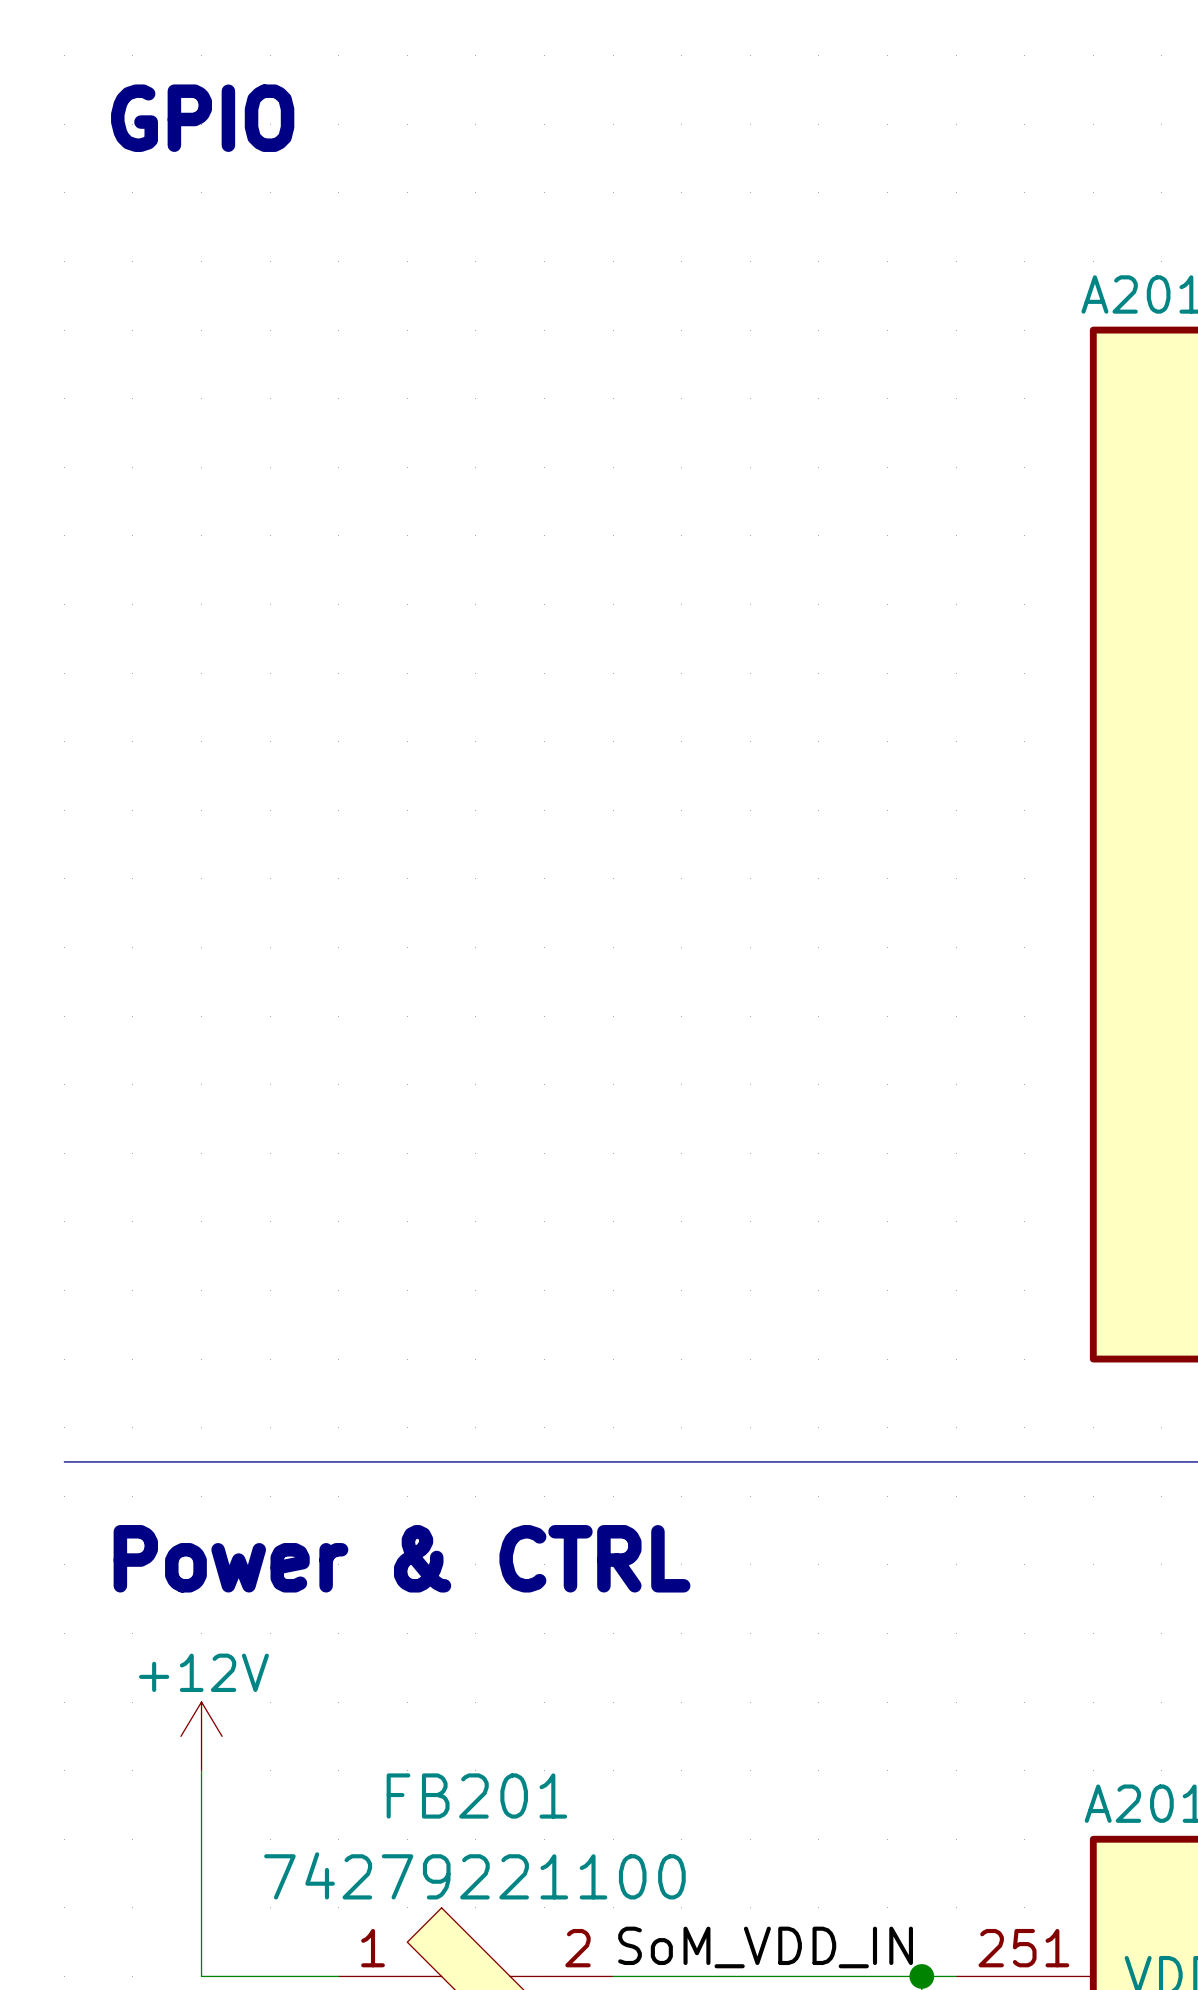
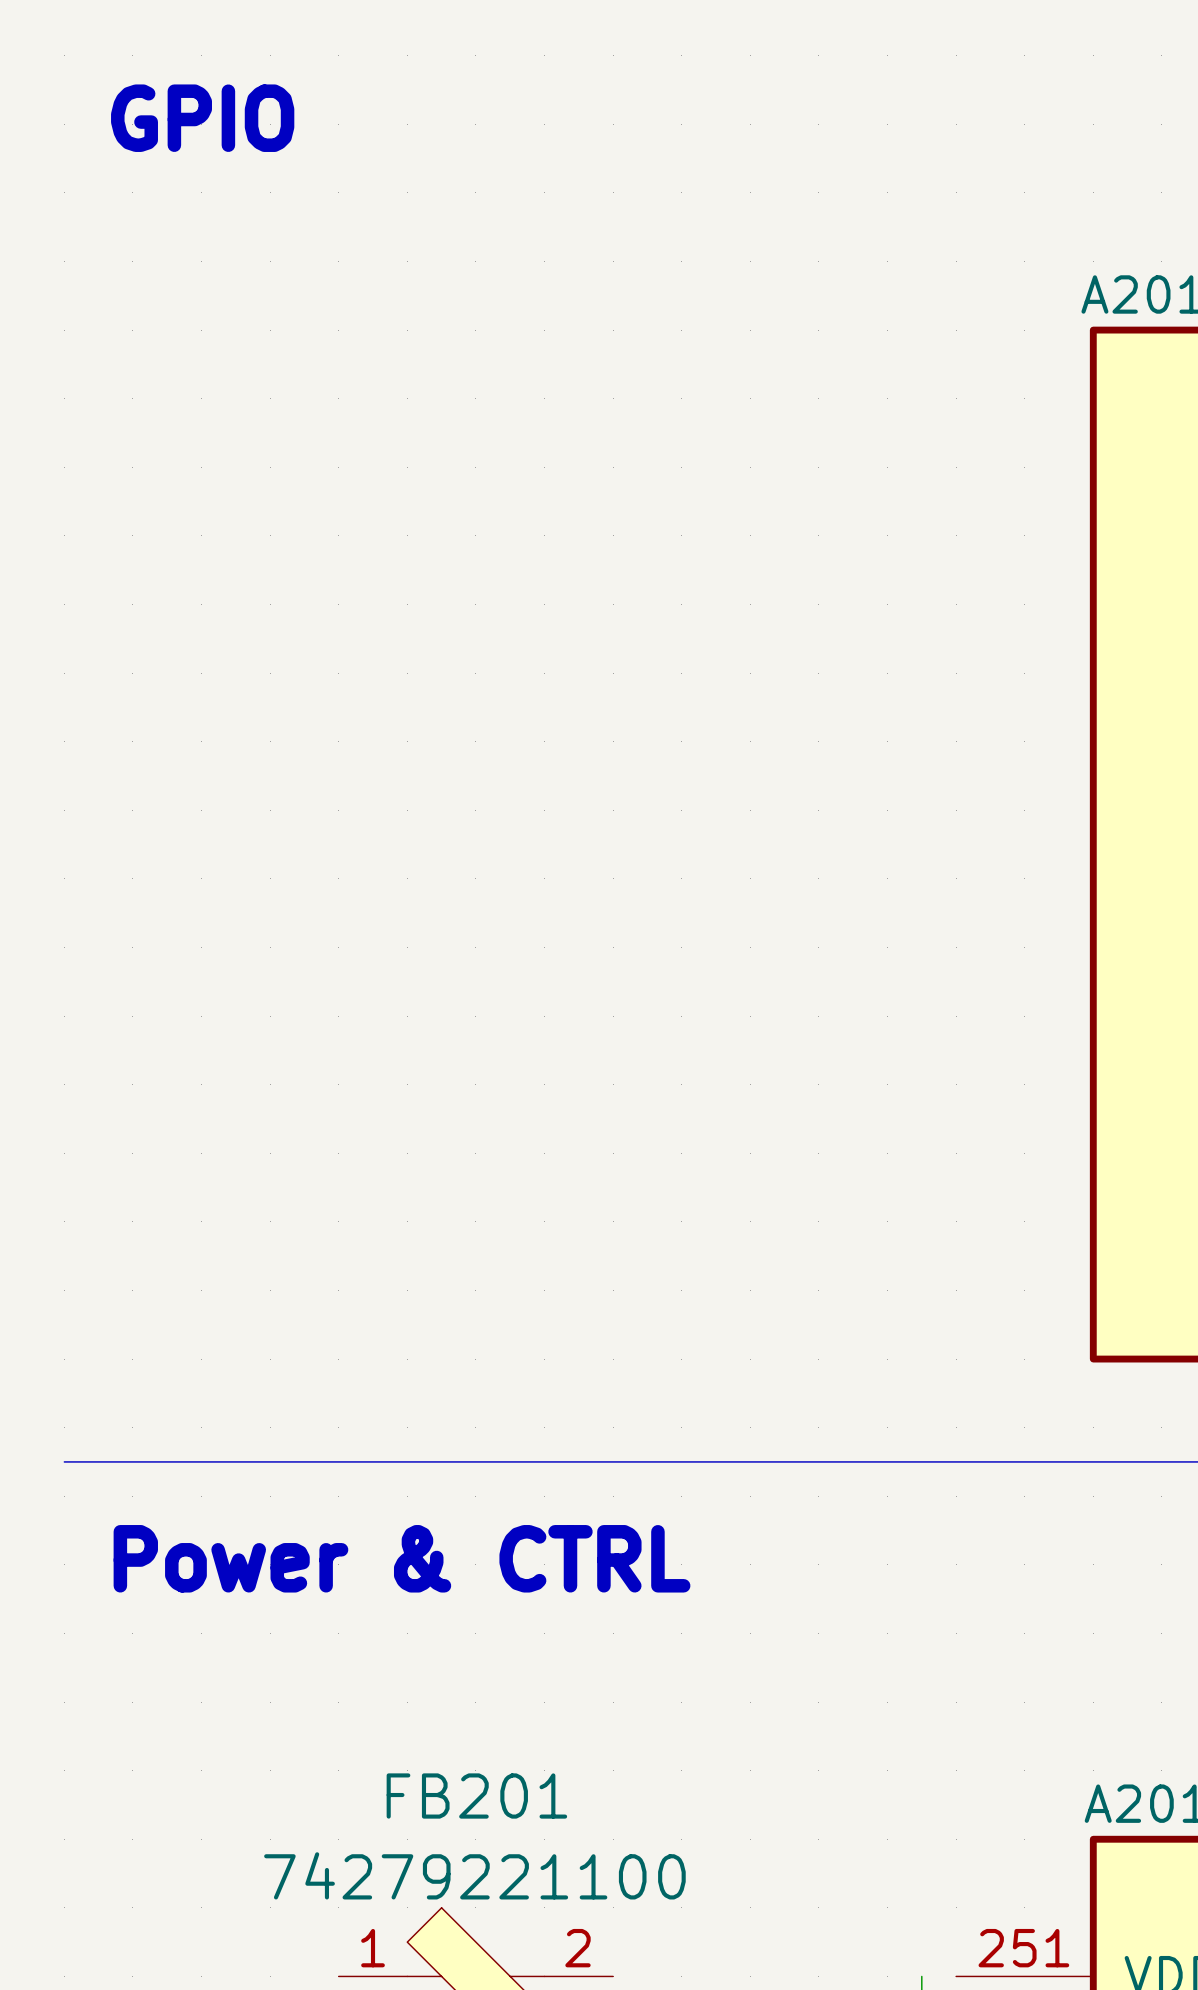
power symbol: +12V (201, 1736) -> none
wire: (201, 1770) (201, 1976) (338, 1976) -> none
label: SoM_VDD_IN (765, 1947) -> none
wire: (613, 1976) (956, 1976) -> none
junction: (921, 1976) -> none

